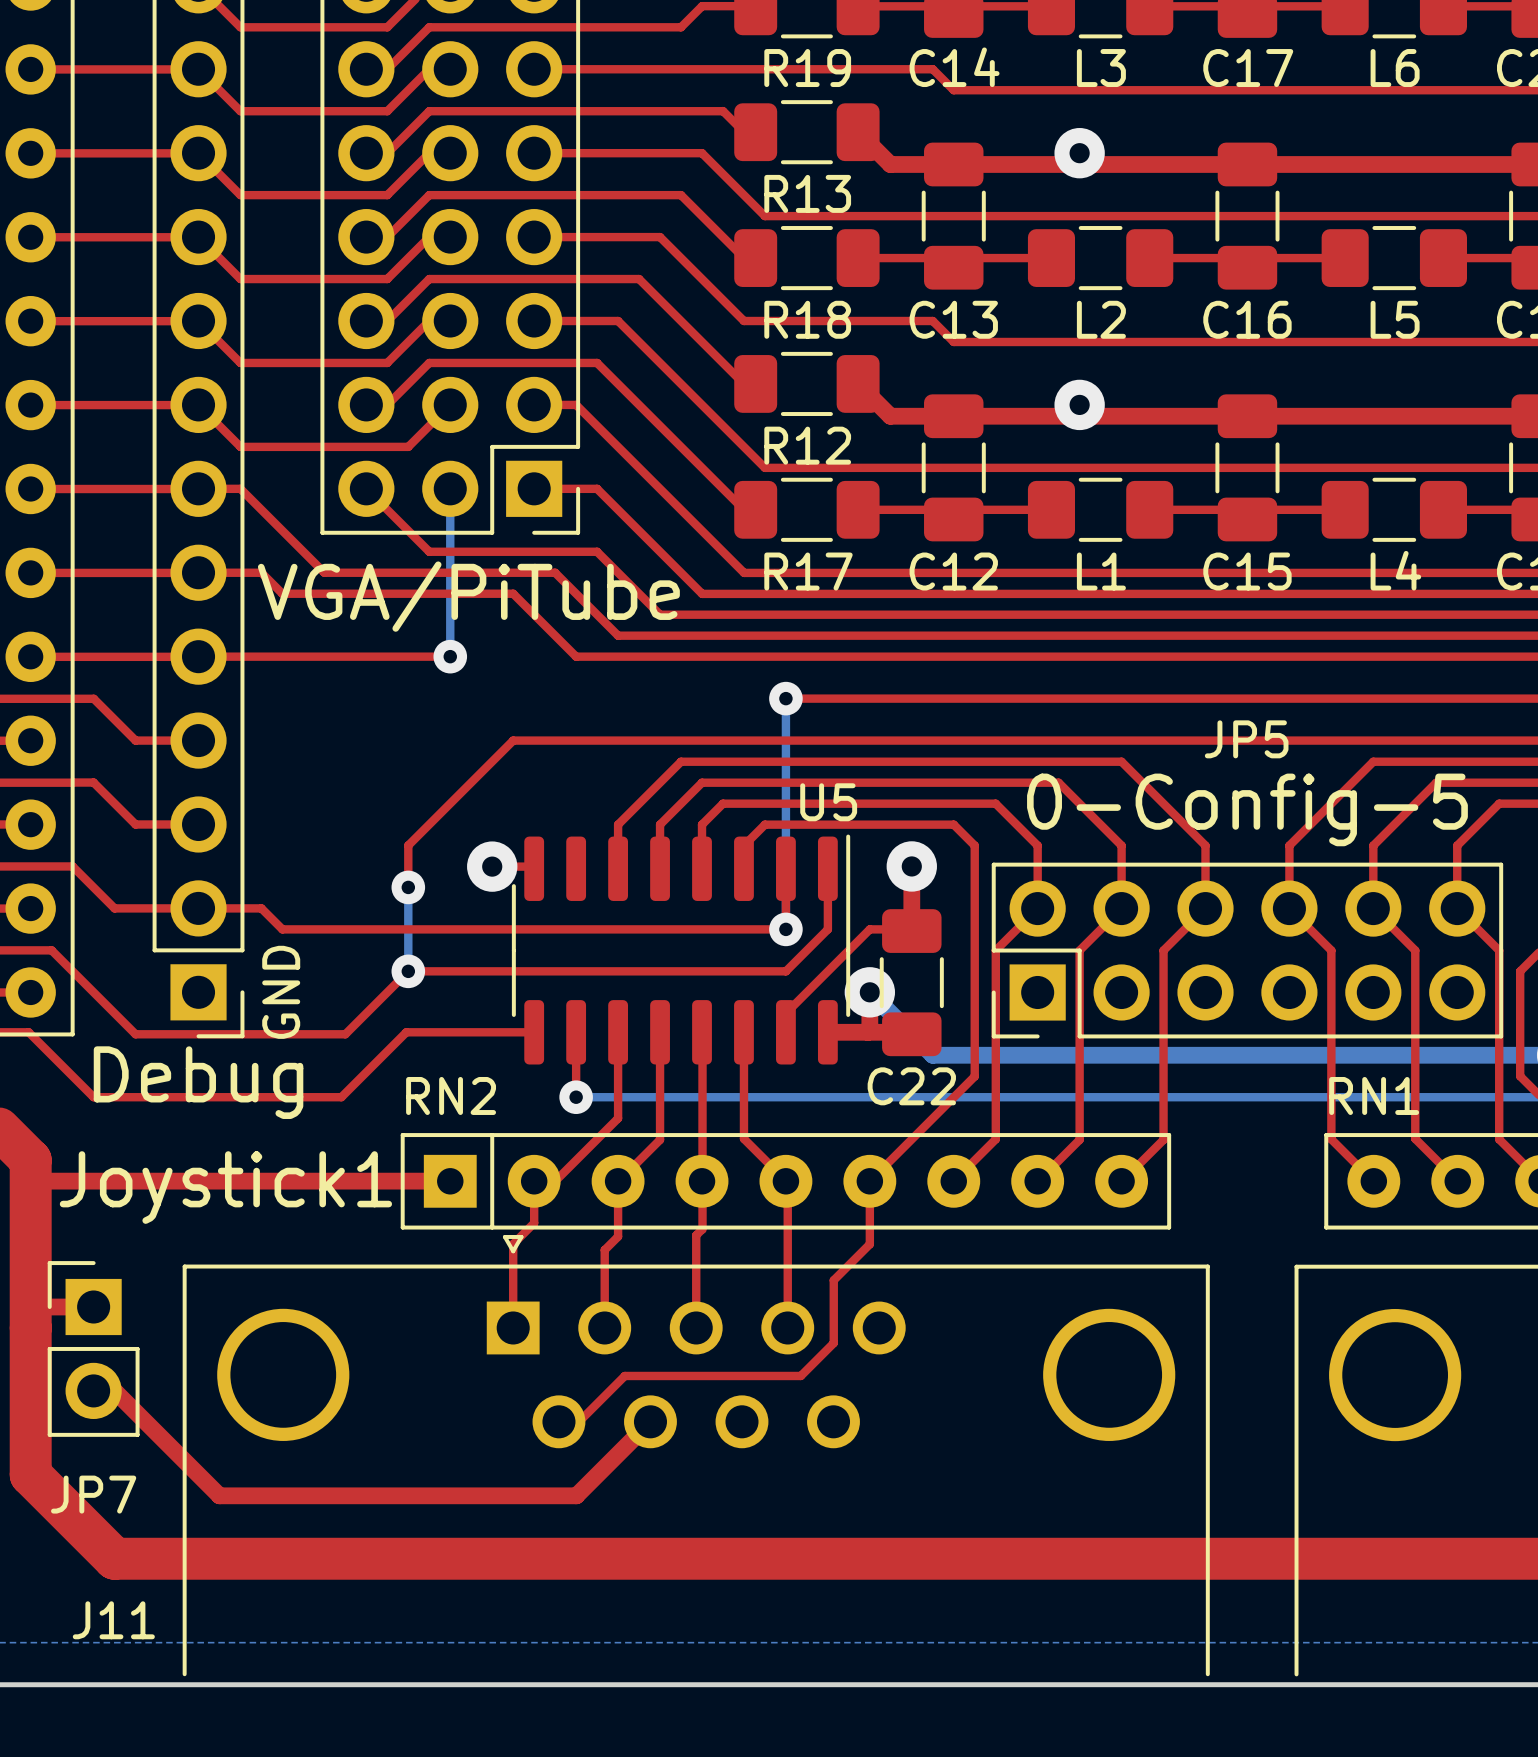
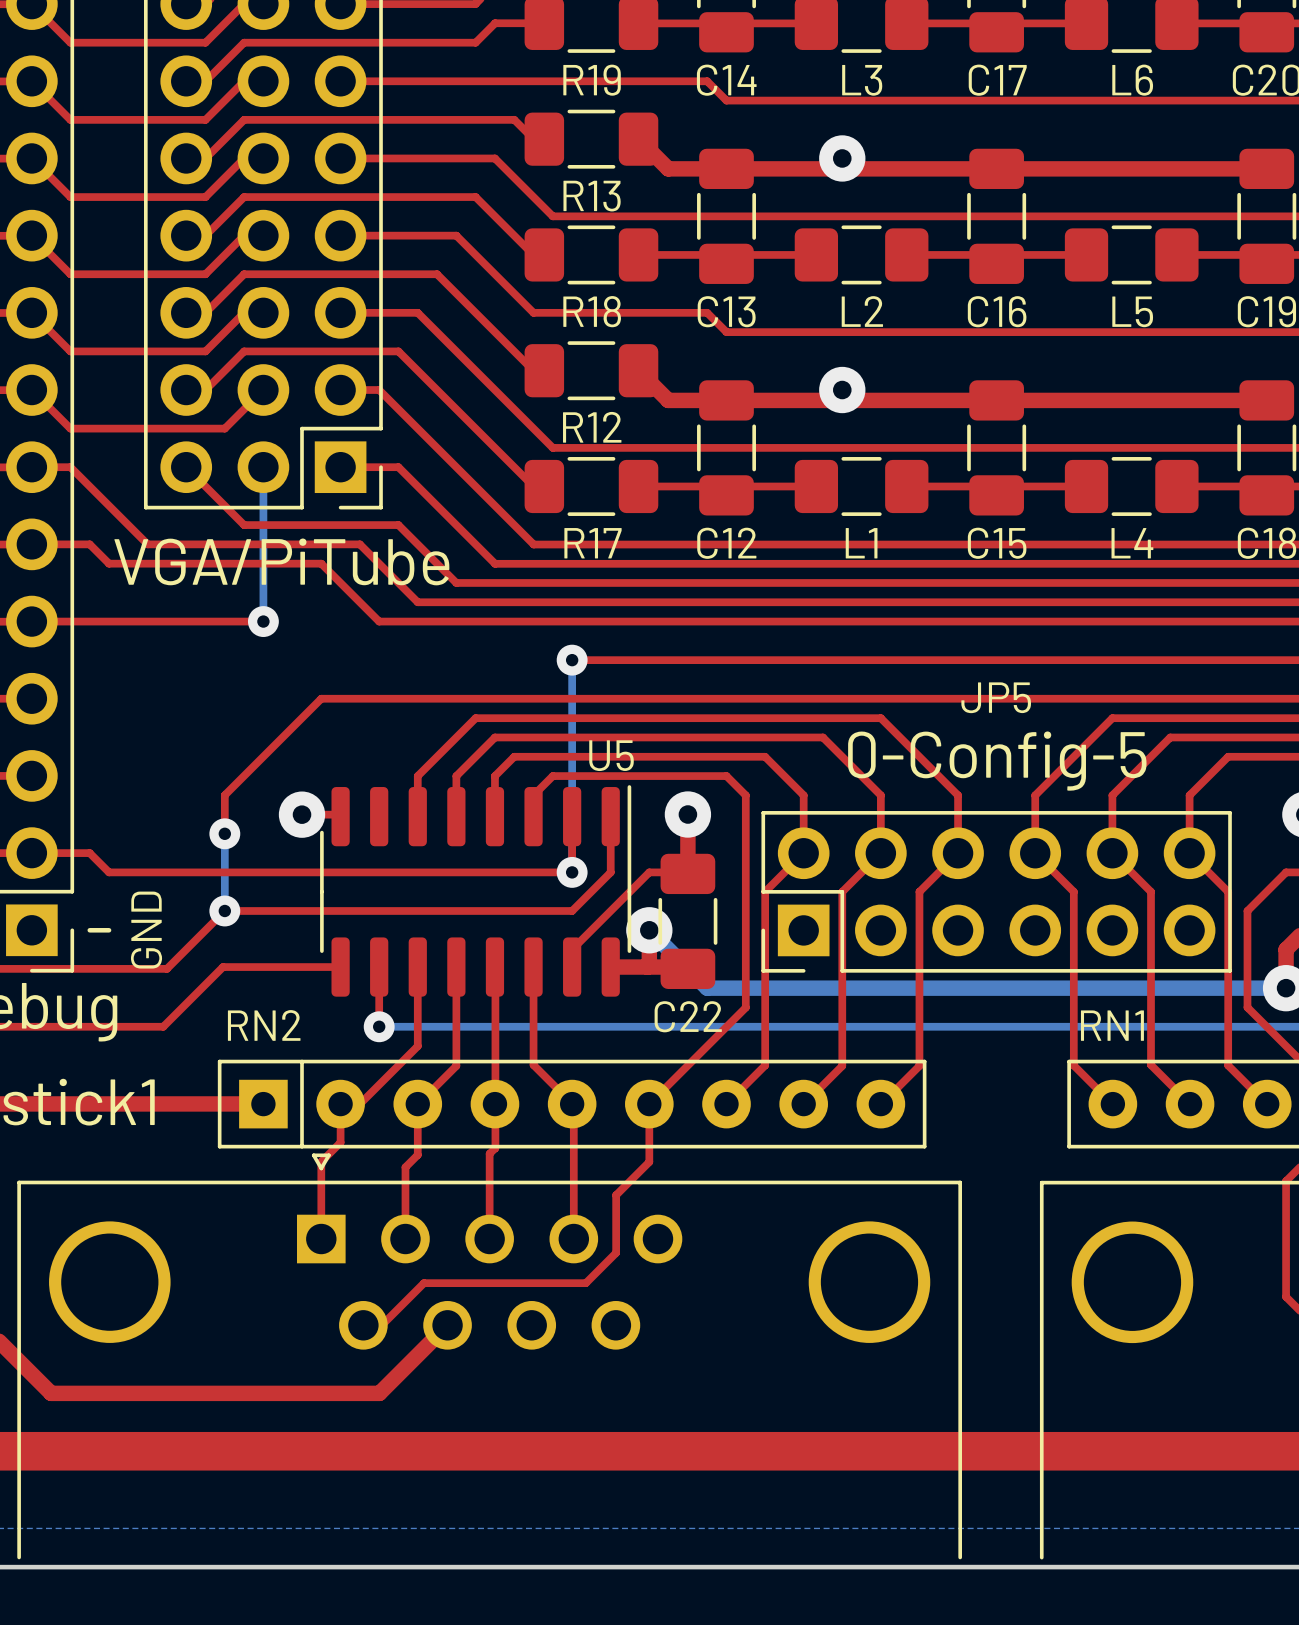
line: none -> (89, 930) (109, 930)
text position: GND (281, 992) -> GND (146, 930)

